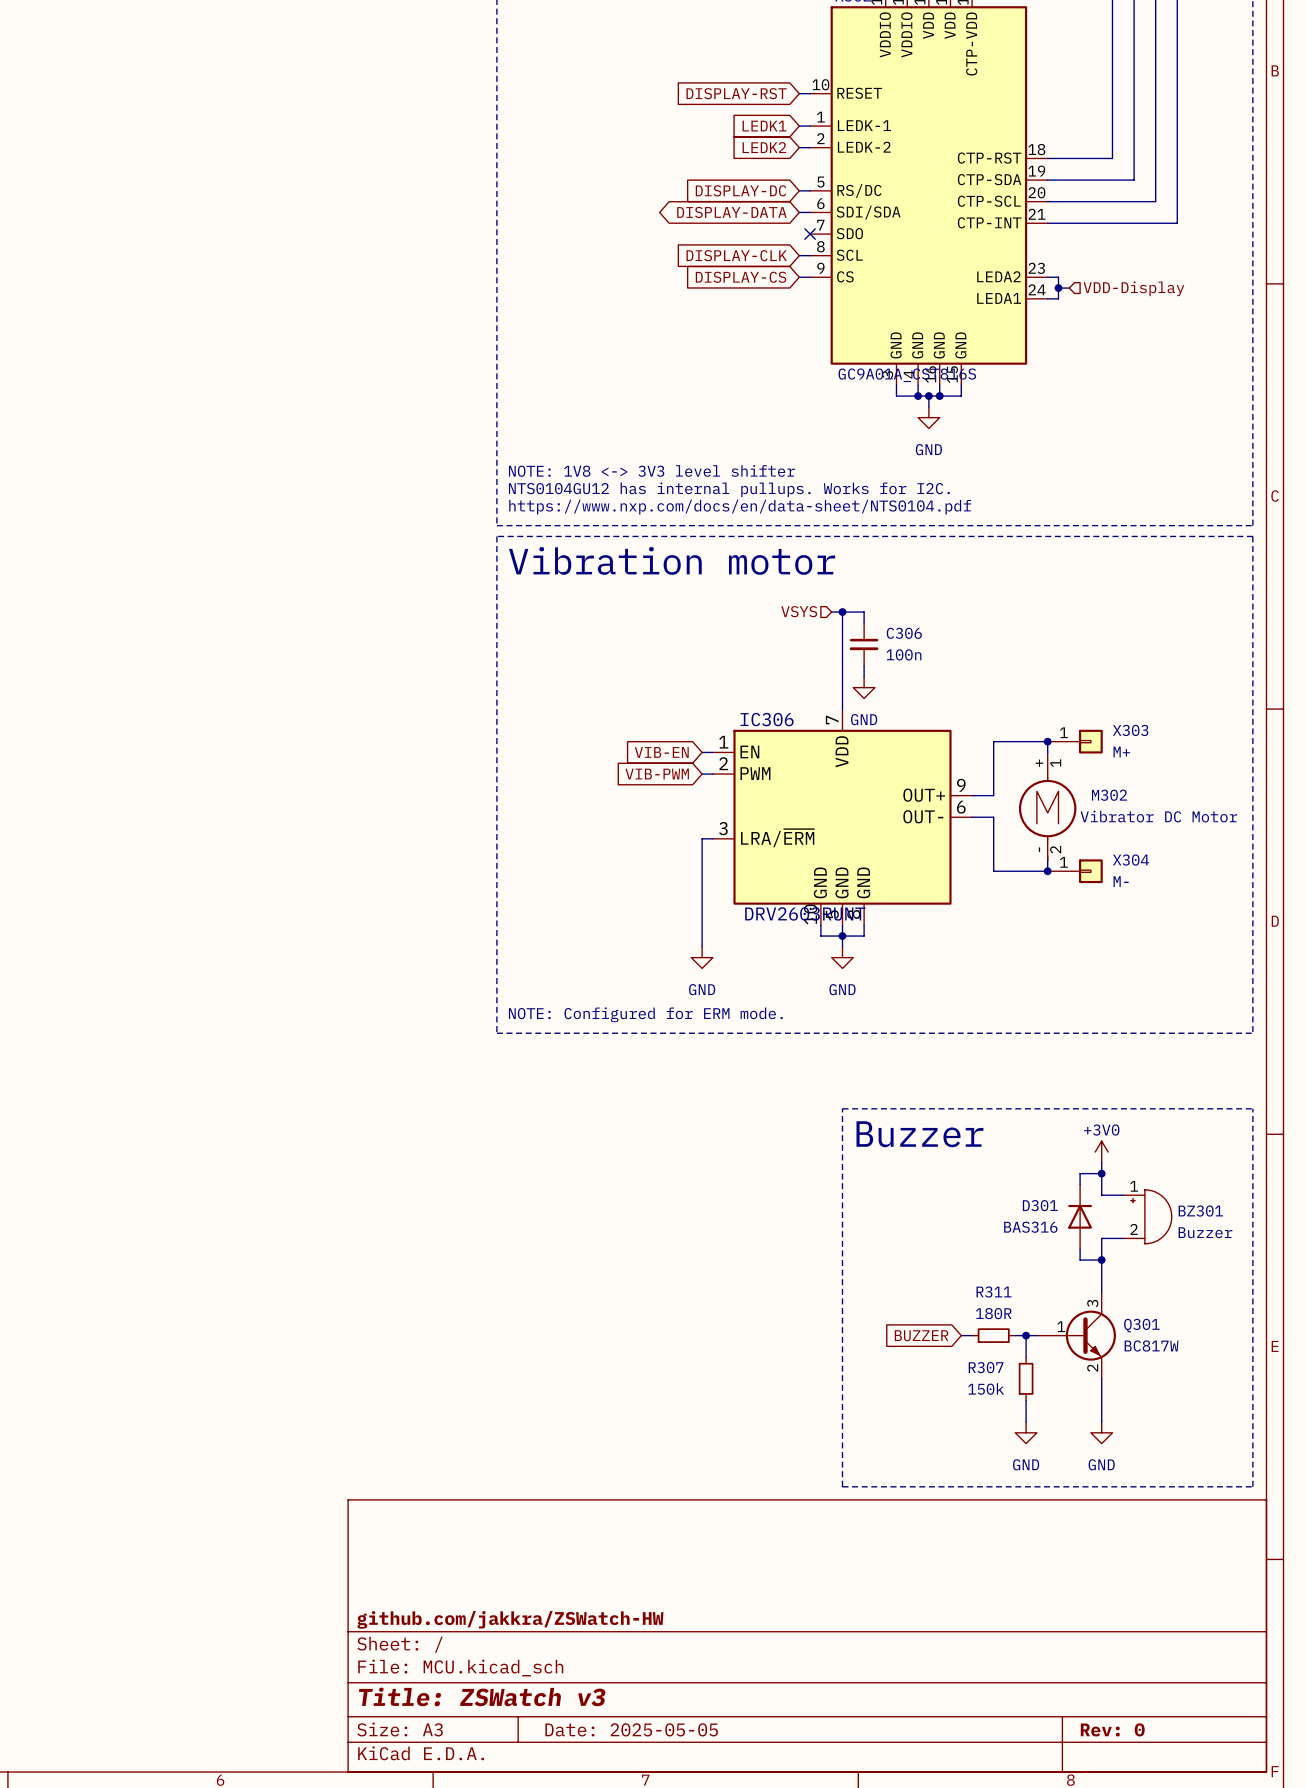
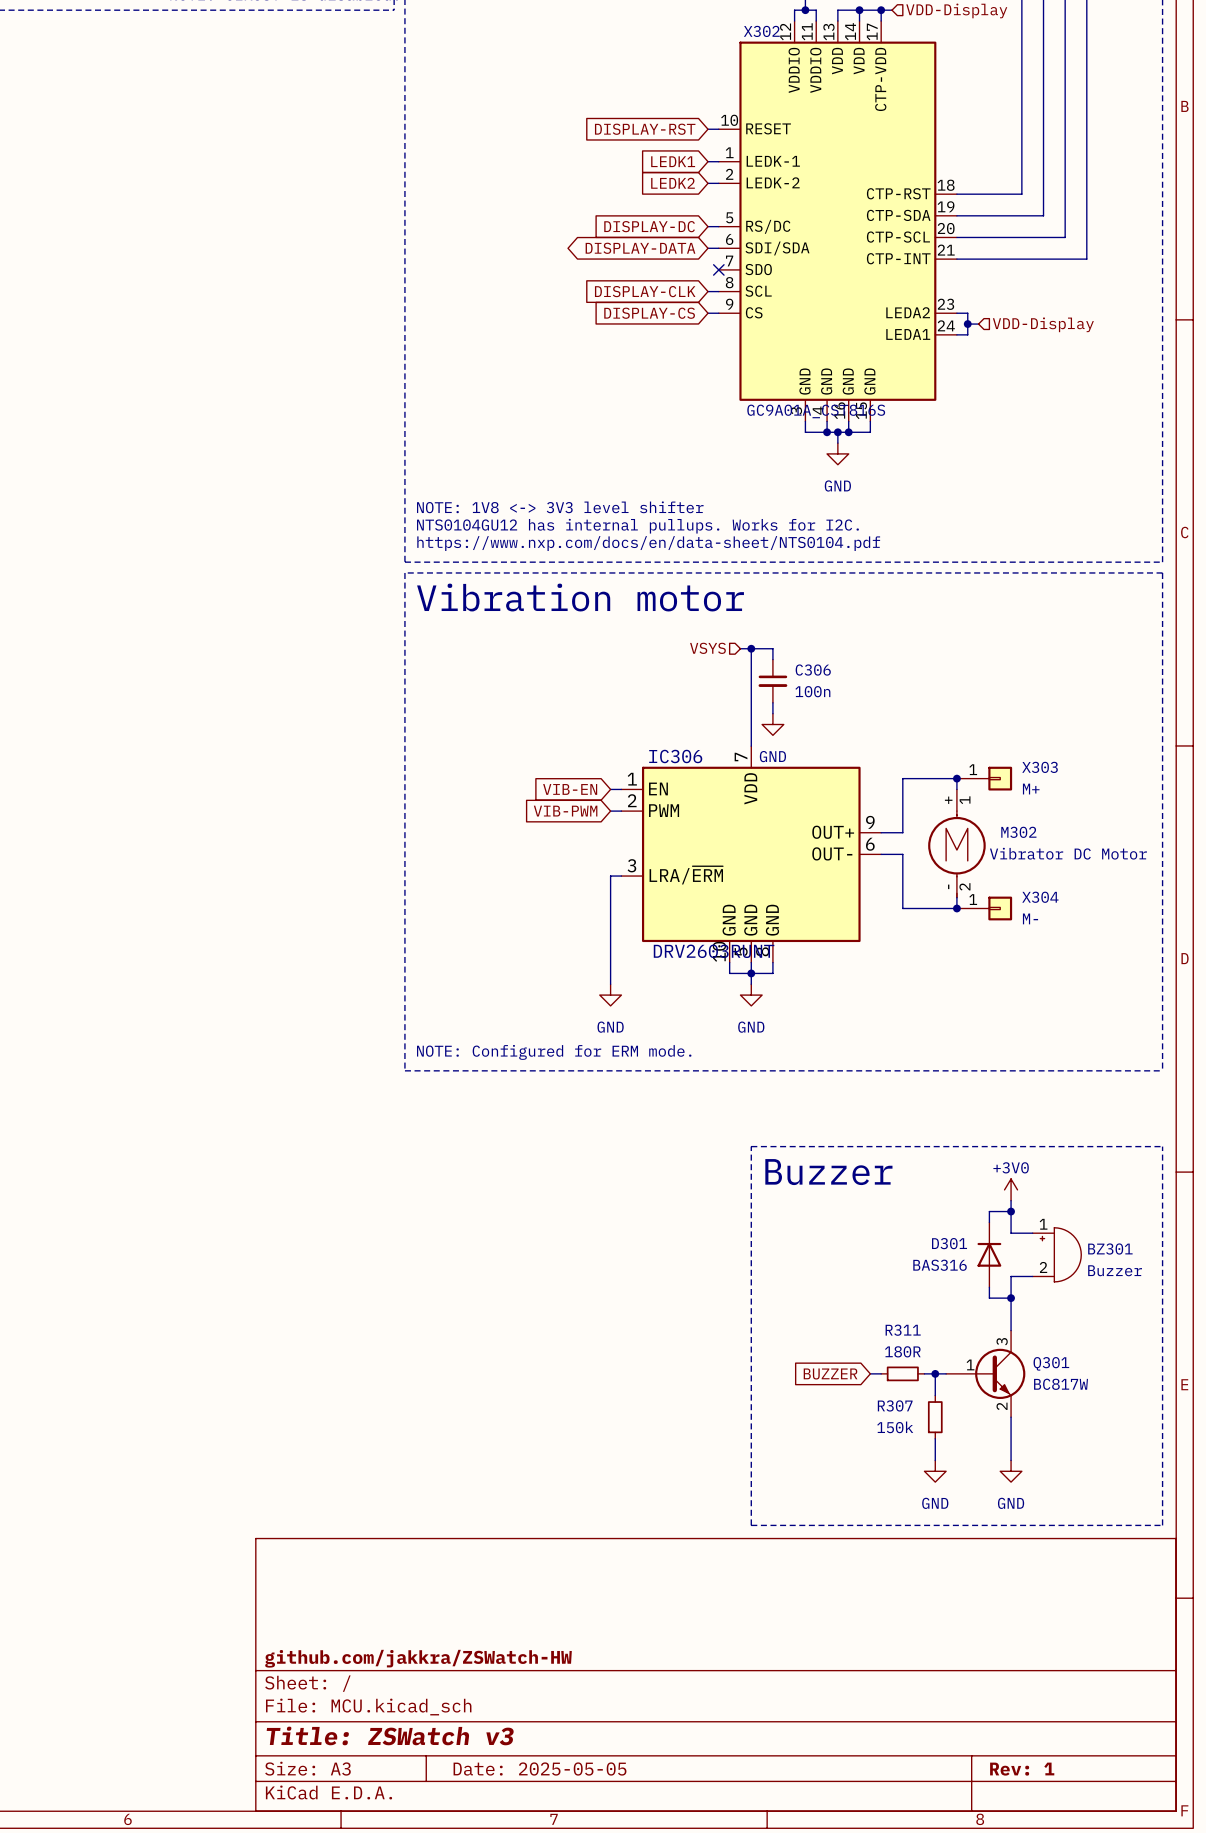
title block: Rev: 0 (1112, 1729) -> Rev: 1 (1022, 1769)

